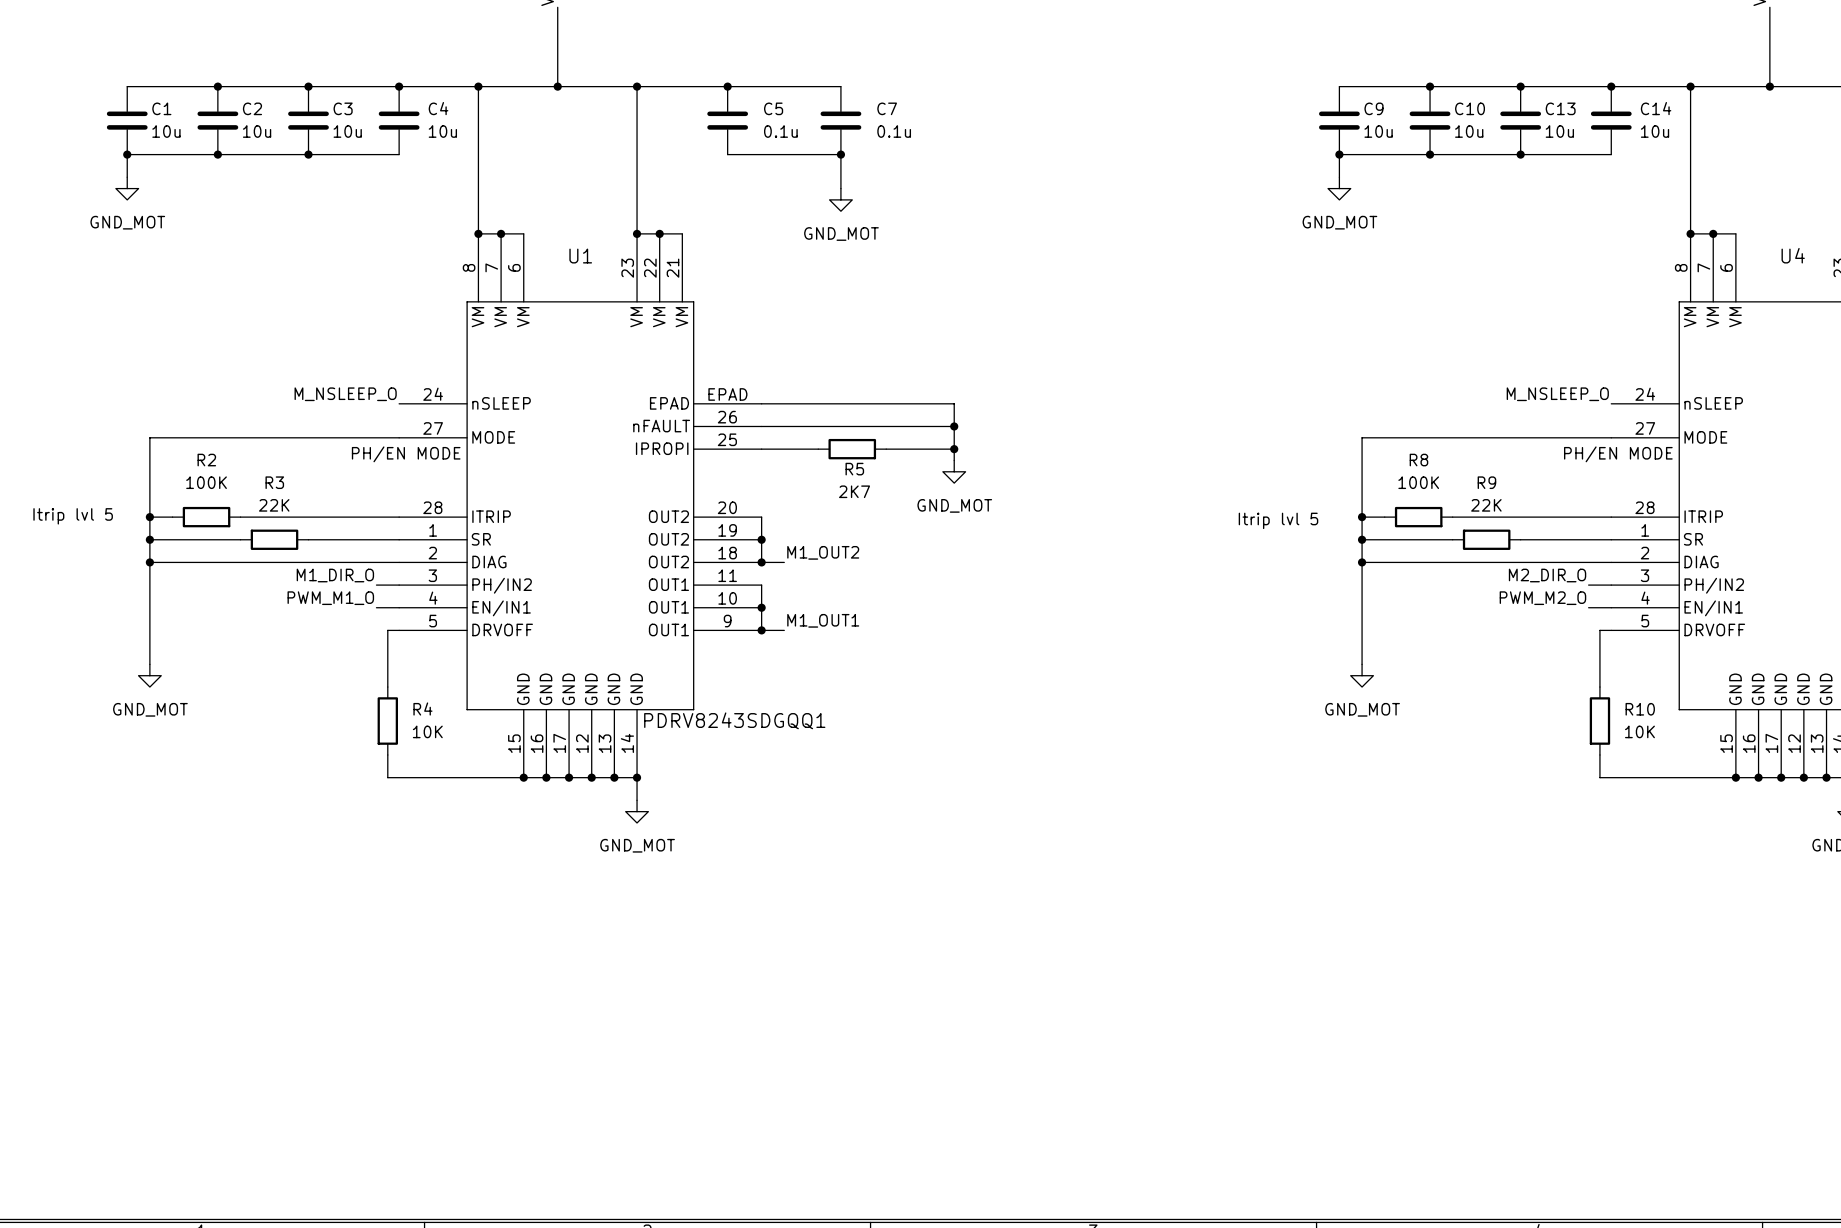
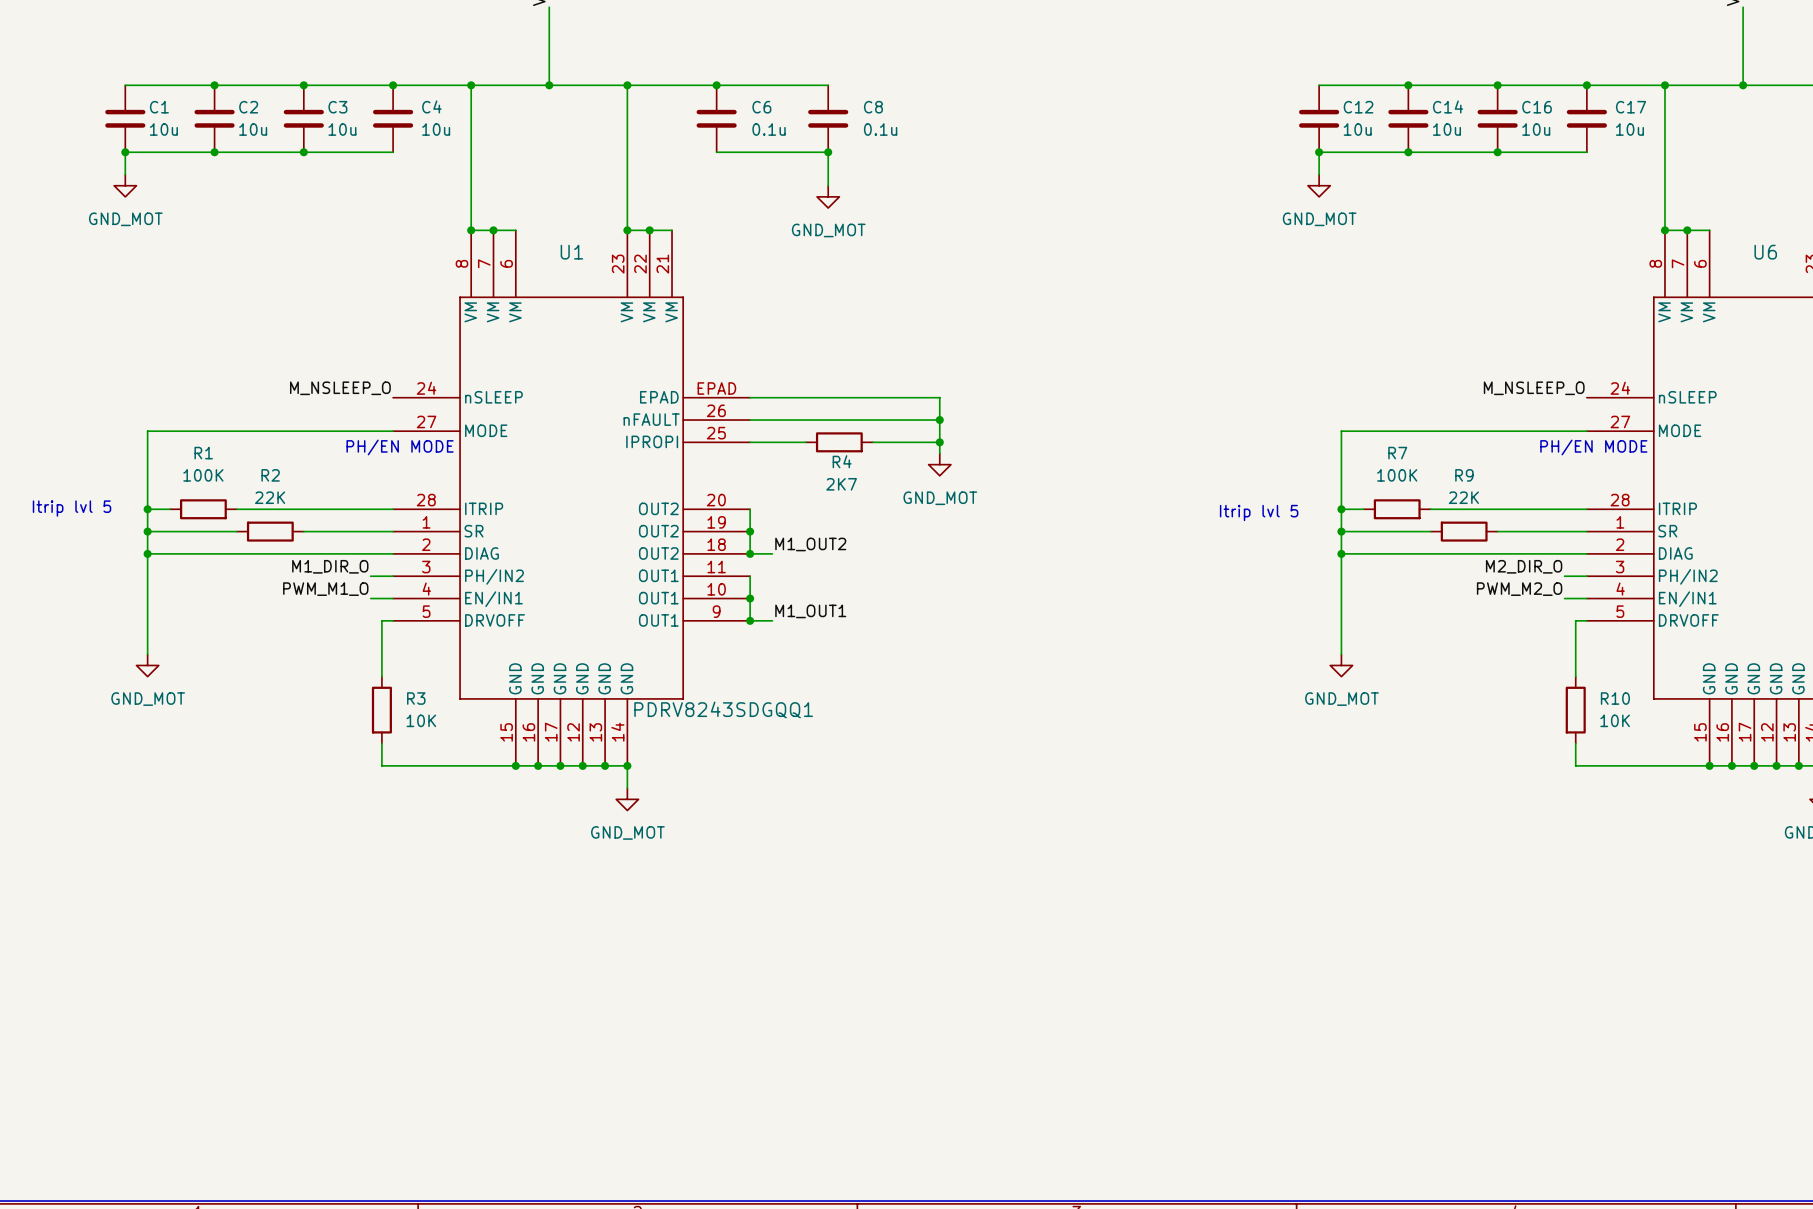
C5 name: C5 (773, 108) -> C6 (761, 107)
C7 name: C7 (887, 108) -> C8 (873, 107)
C9 name: C9 (1374, 108) -> C12 (1358, 107)
C10 name: C10 (1470, 108) -> C14 (1448, 106)
C13 name: C13 (1560, 108) -> C16 (1537, 107)
C14 name: C14 (1656, 108) -> C17 (1631, 107)
U4 name: U4 (1793, 255) -> U6 (1765, 252)
R2 name: R2 (206, 460) -> R1 (203, 453)
R8 name: R8 (1418, 460) -> R7 (1397, 453)
R5 name: R5 (854, 469) -> R4 (842, 461)
R3 name: R3 (274, 482) -> R2 (270, 475)
R4 name: R4 (422, 709) -> R3 (416, 698)

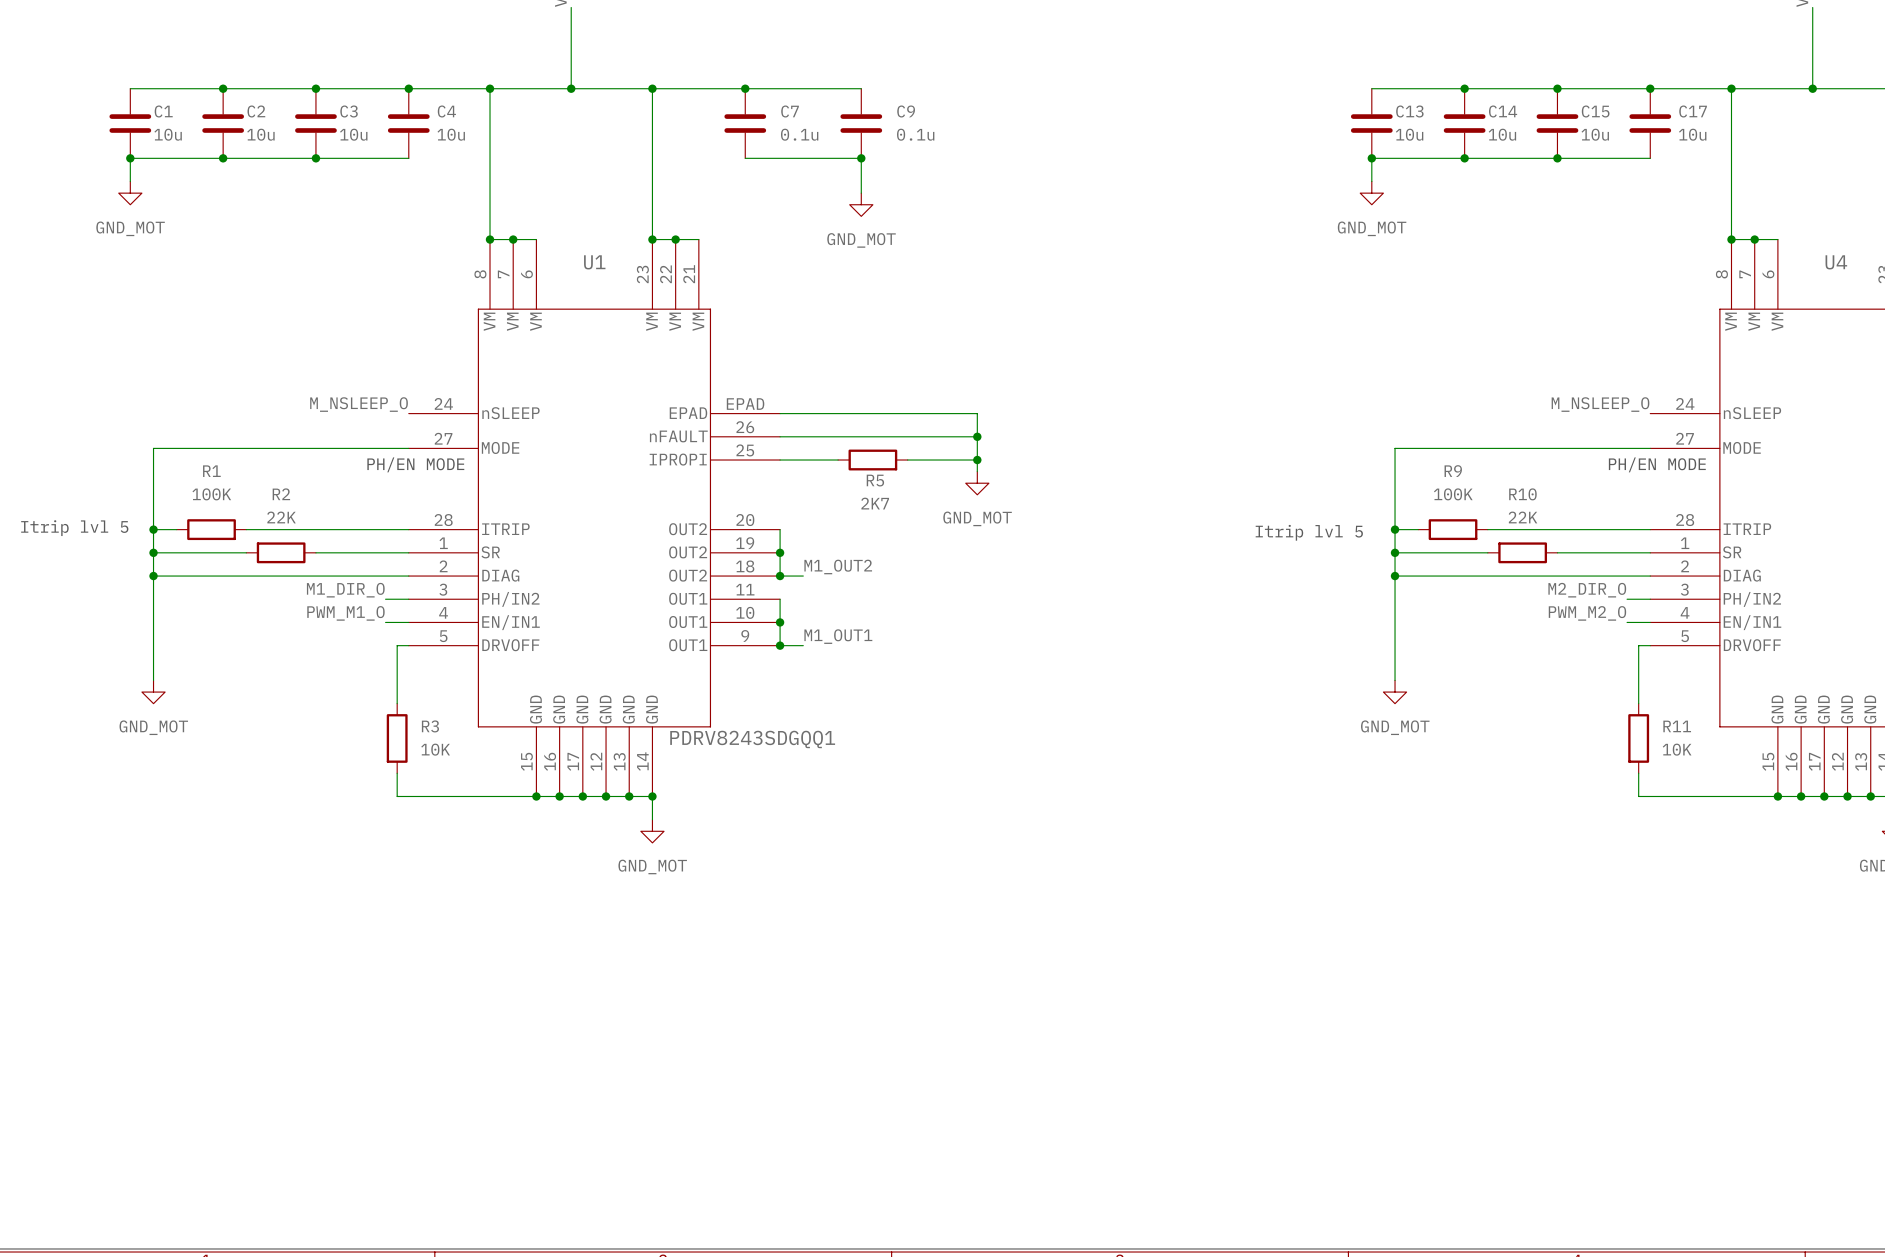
C6 name: C6 (761, 107) -> C7 (790, 111)
C8 name: C8 (873, 107) -> C9 (906, 111)
C12 name: C12 (1358, 107) -> C13 (1409, 111)
C16 name: C16 (1537, 107) -> C15 (1595, 111)
U6 name: U6 (1765, 252) -> U4 (1836, 262)
R7 name: R7 (1397, 453) -> R9 (1453, 471)
R4 name: R4 (842, 461) -> R5 (875, 480)
R9 name: R9 (1464, 475) -> R10 (1522, 494)
R10 name: R10 (1615, 698) -> R11 (1677, 726)

